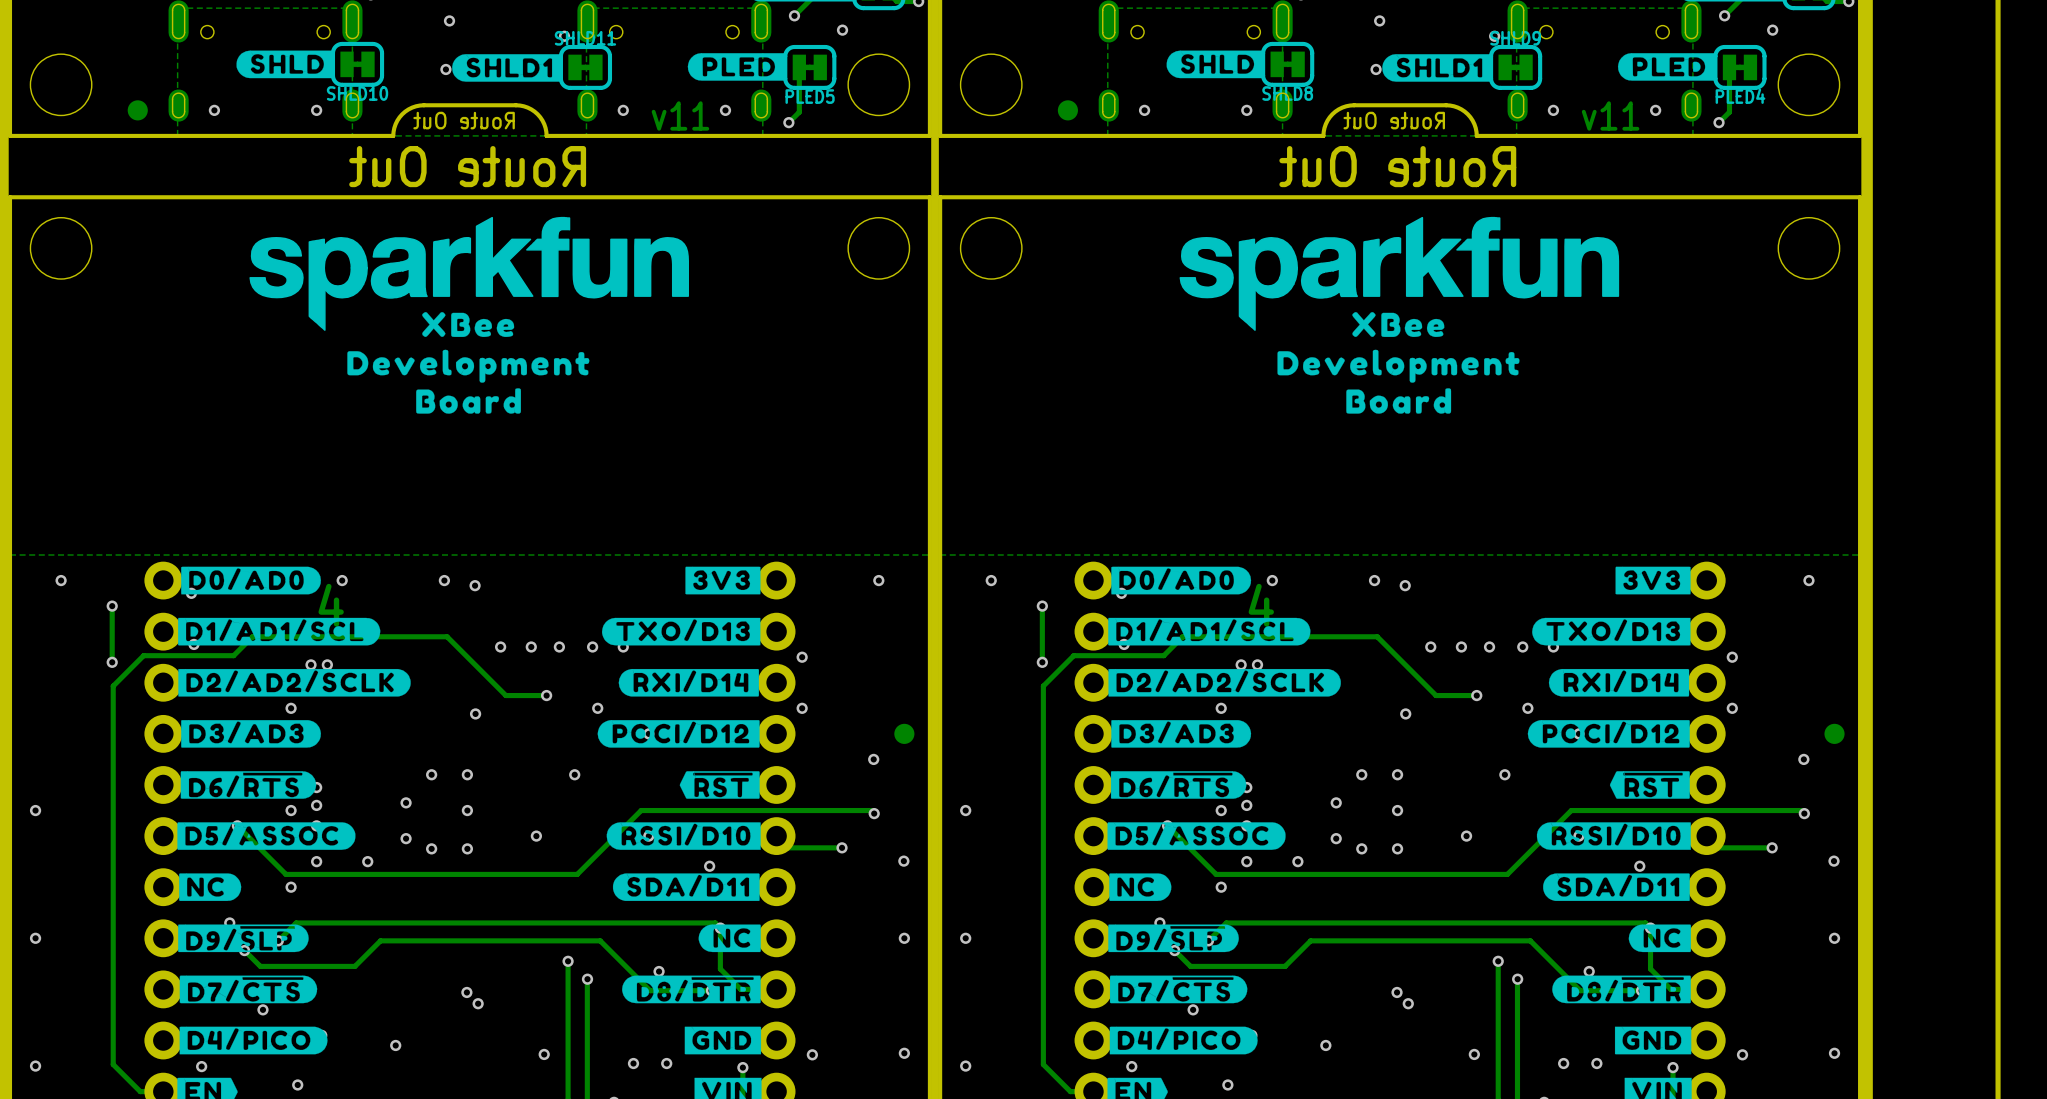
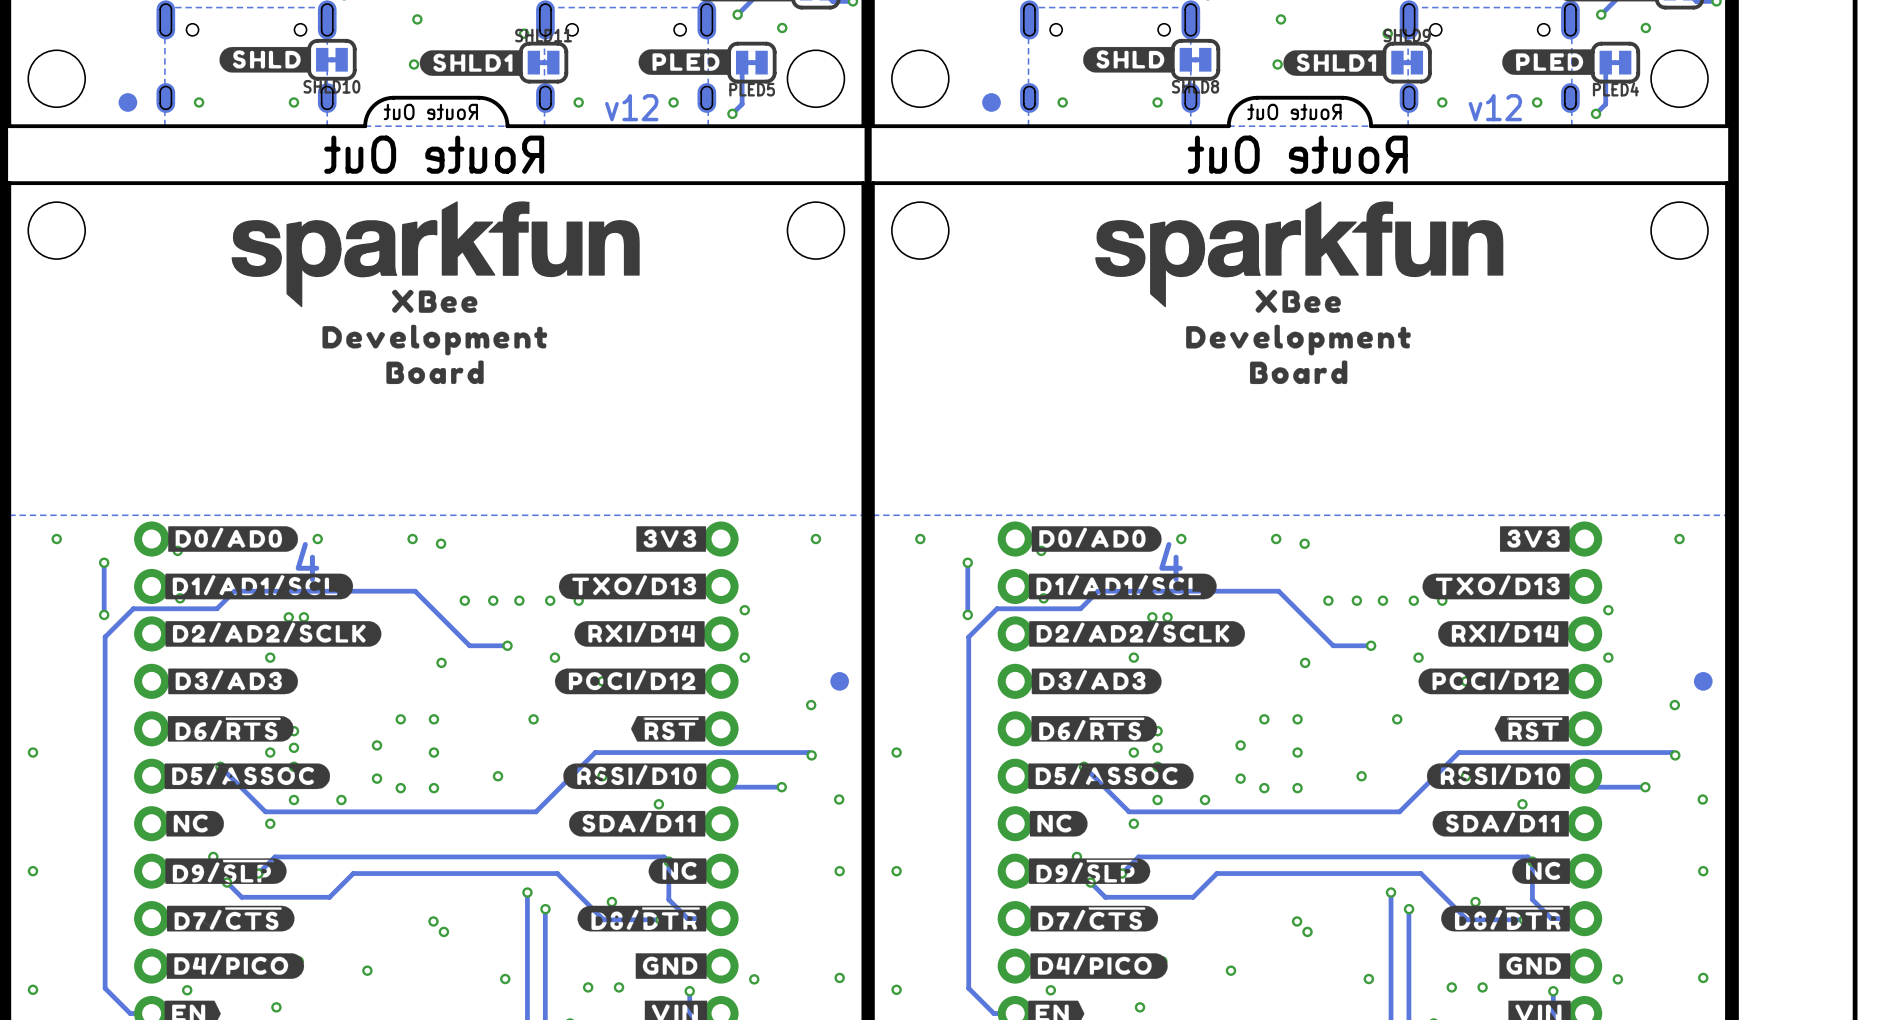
text: v11 (680, 115) -> v12 (631, 107)
text: v11 (1610, 115) -> v12 (1495, 107)
via: (262, 1009) -> none
via: (1193, 1009) -> none

